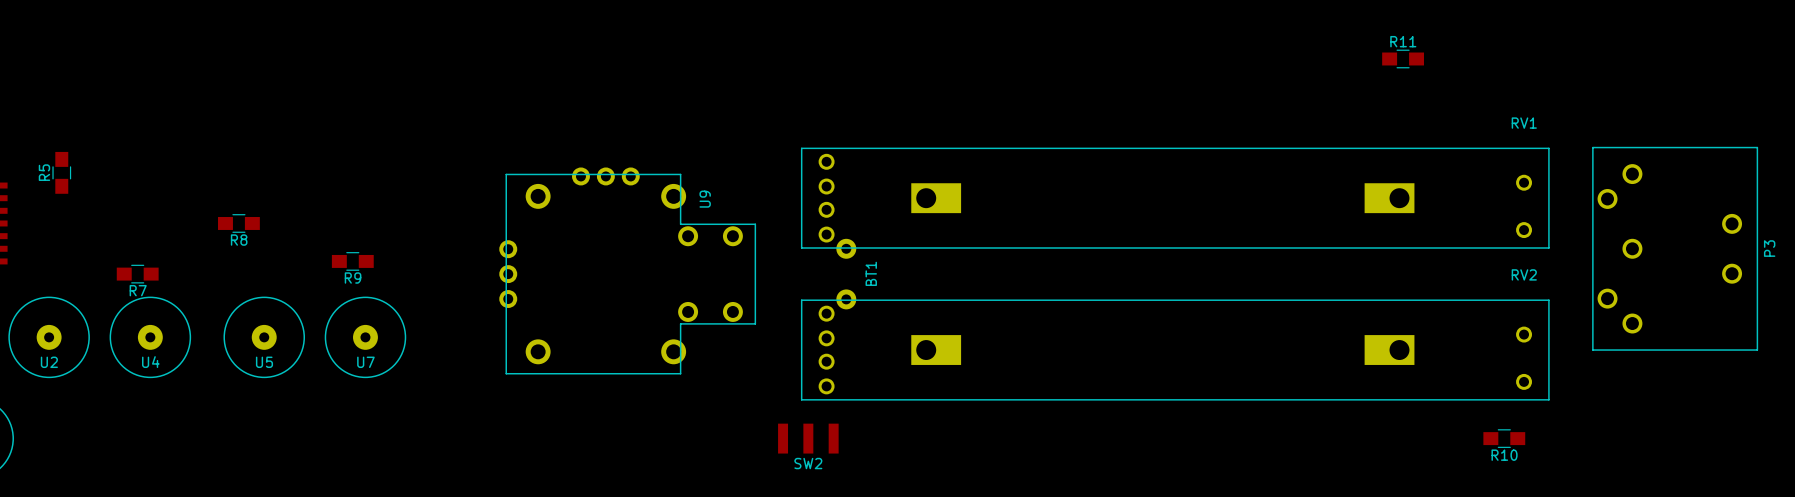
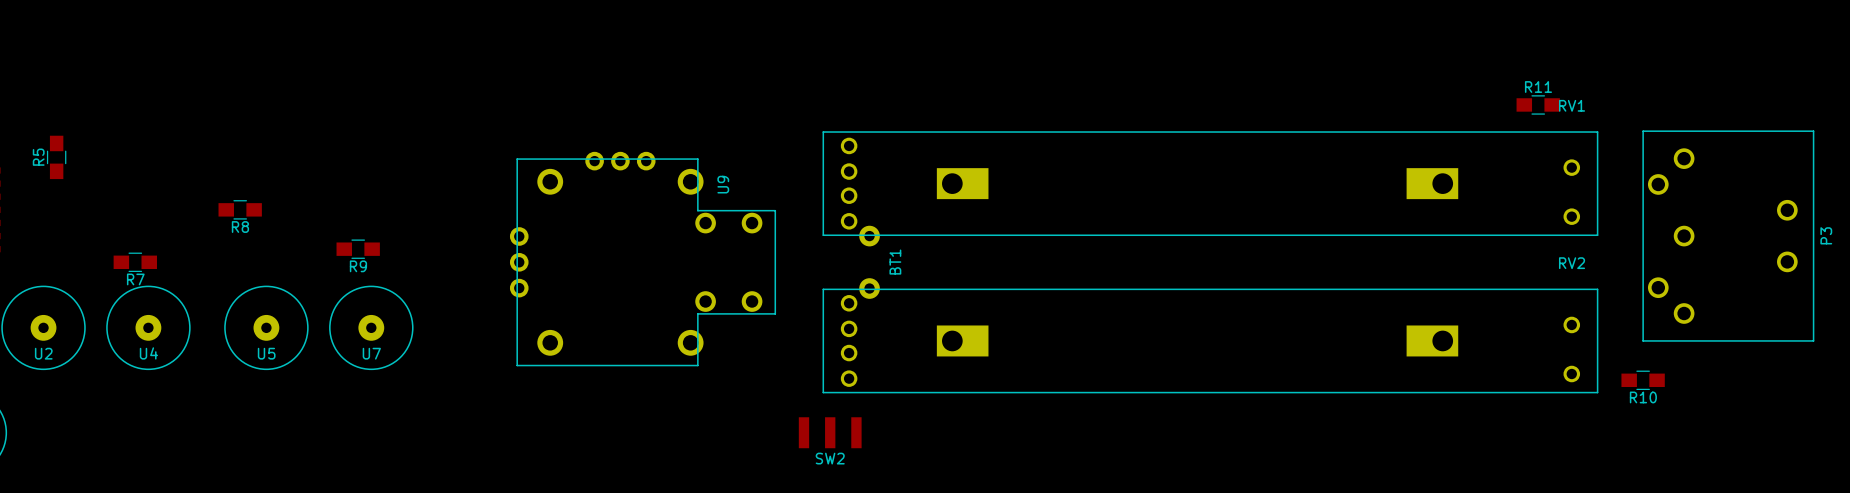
R11 position: (1403, 58) -> (1538, 104)
R10 position: (1504, 438) -> (1643, 380)

